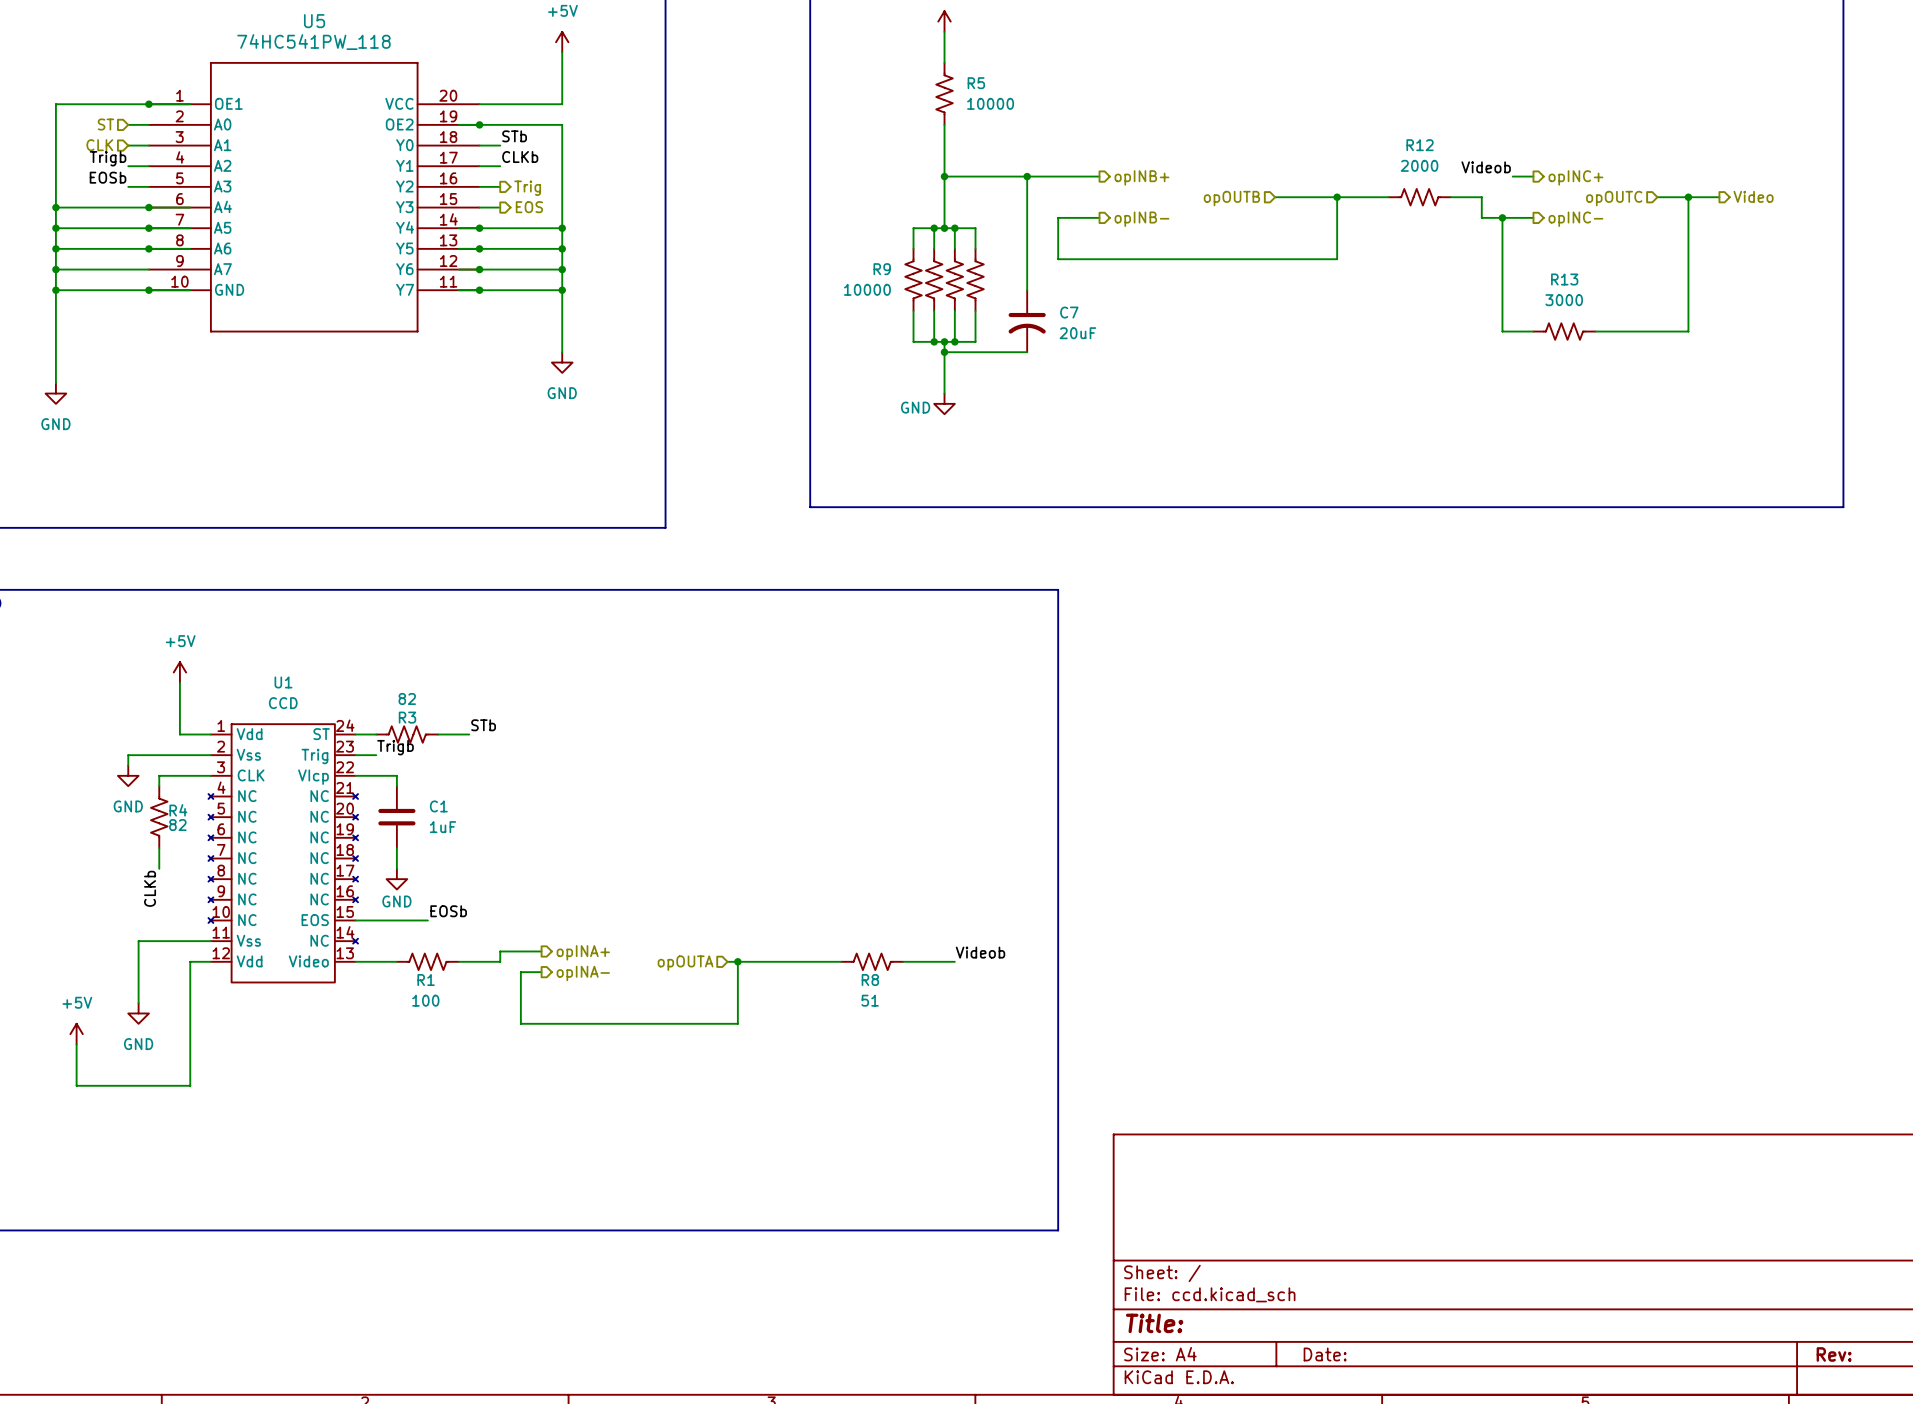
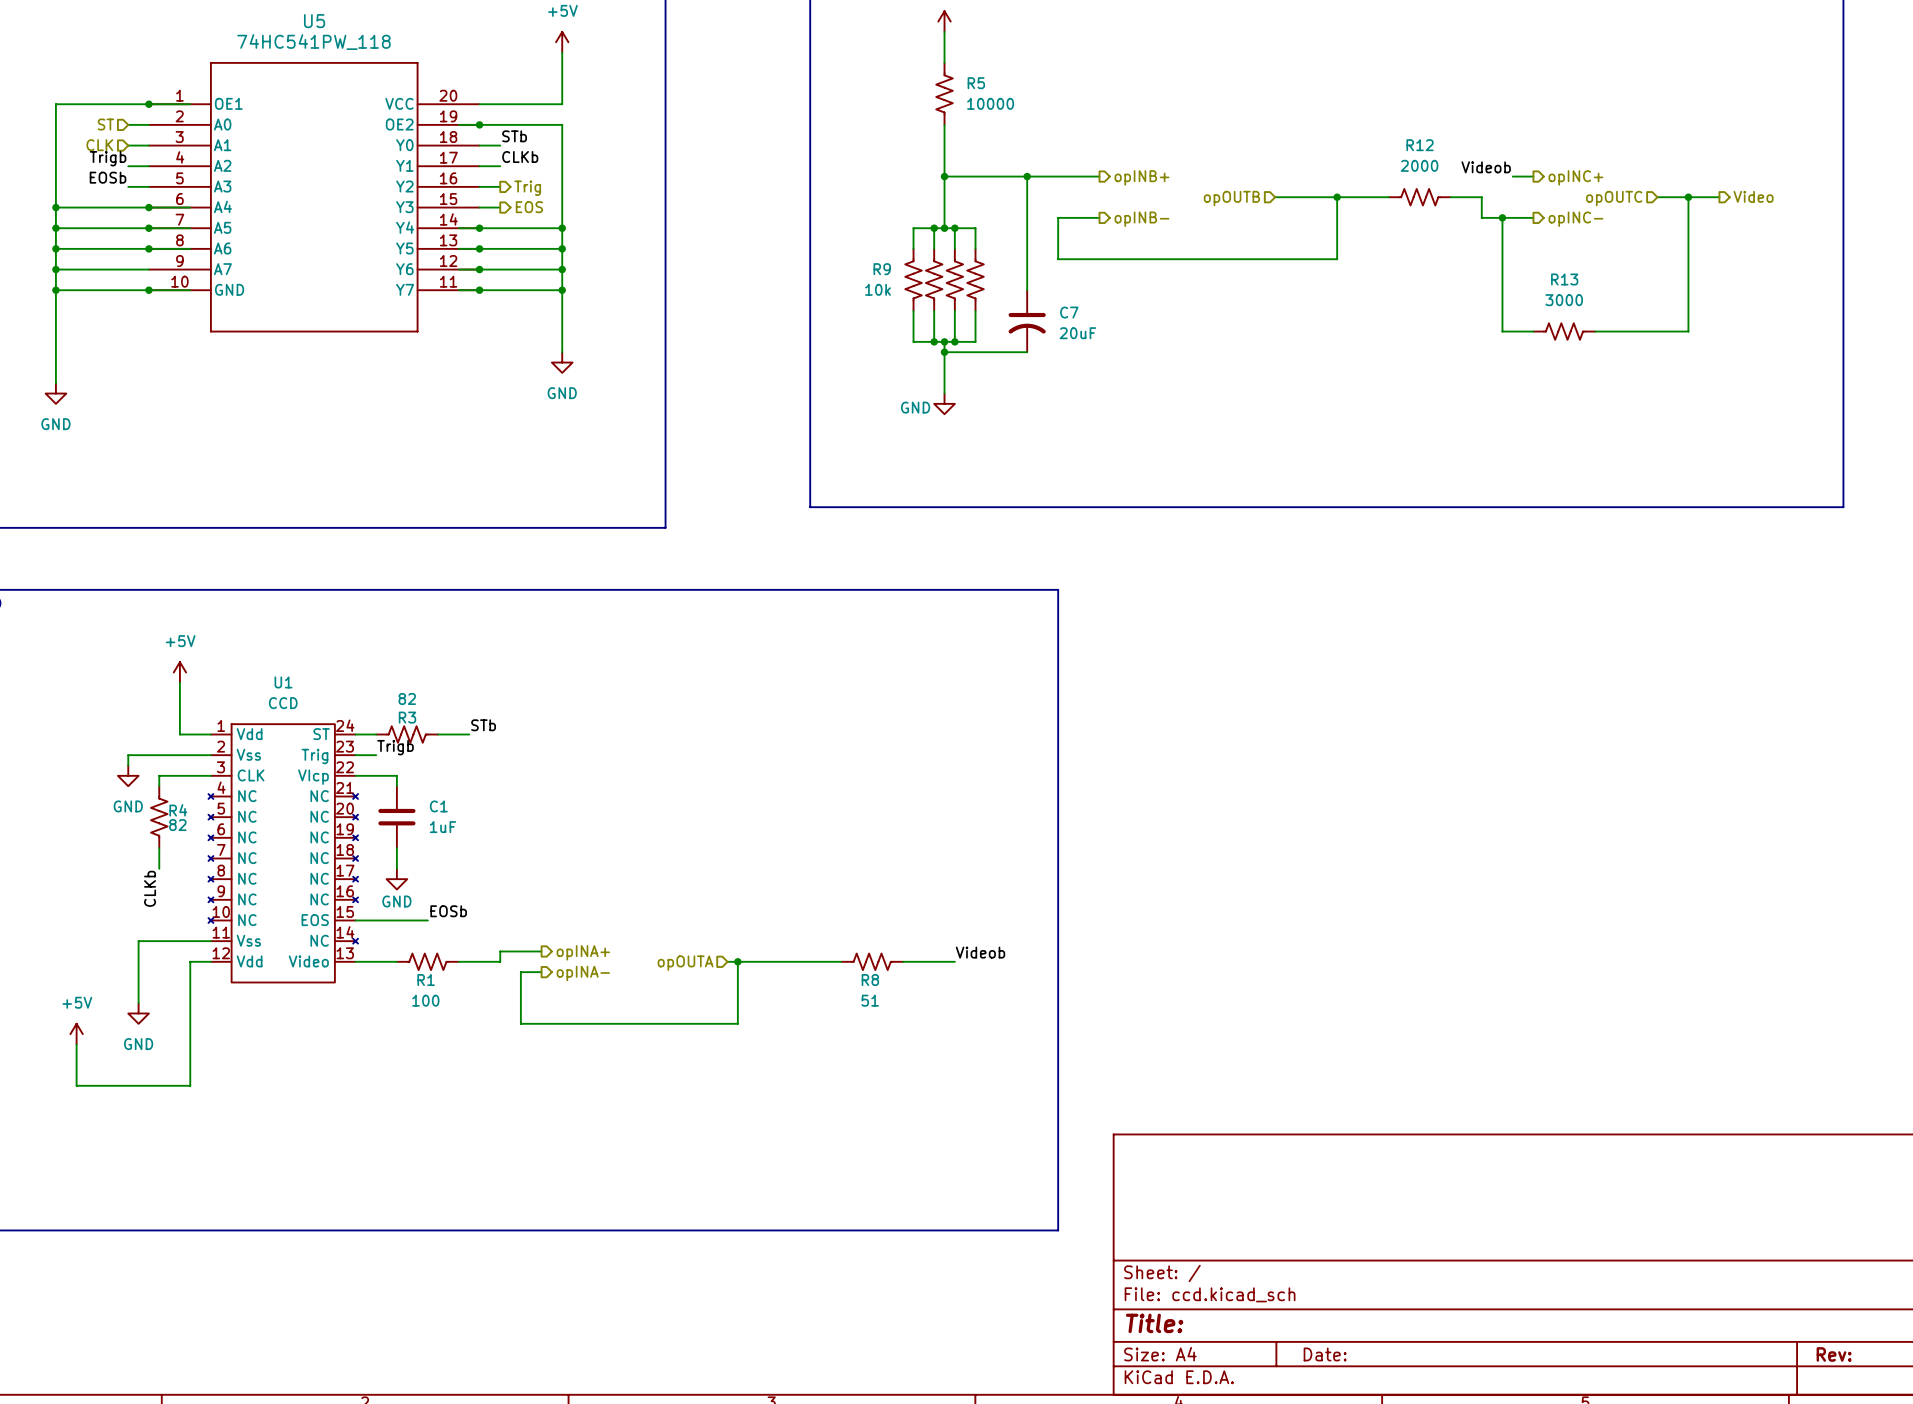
R9 value: 10000 (867, 289) -> 10k (878, 289)

